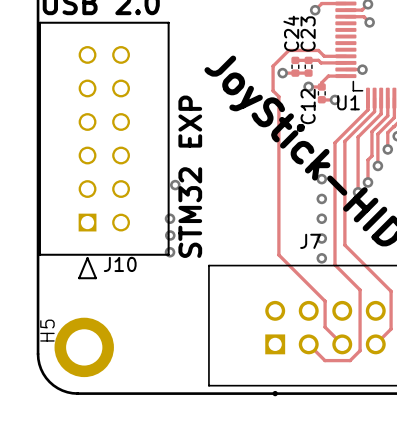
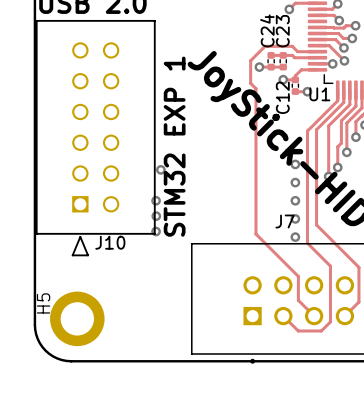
track: none -> (355, 25) (346, 25) (343, 28) (317, 27)
via: none -> (355, 25)
track: none -> (317, 33) (338, 33) (343, 38) (352, 38)
via: none -> (352, 38)
track: none -> (317, 39) (335, 39) (343, 47)
track: none -> (317, 45) (329, 45) (344, 60)
via: none -> (343, 47)
via: none -> (344, 60)
text: STM32 EXP (190, 176) -> STM32 EXP 1 (174, 146)

